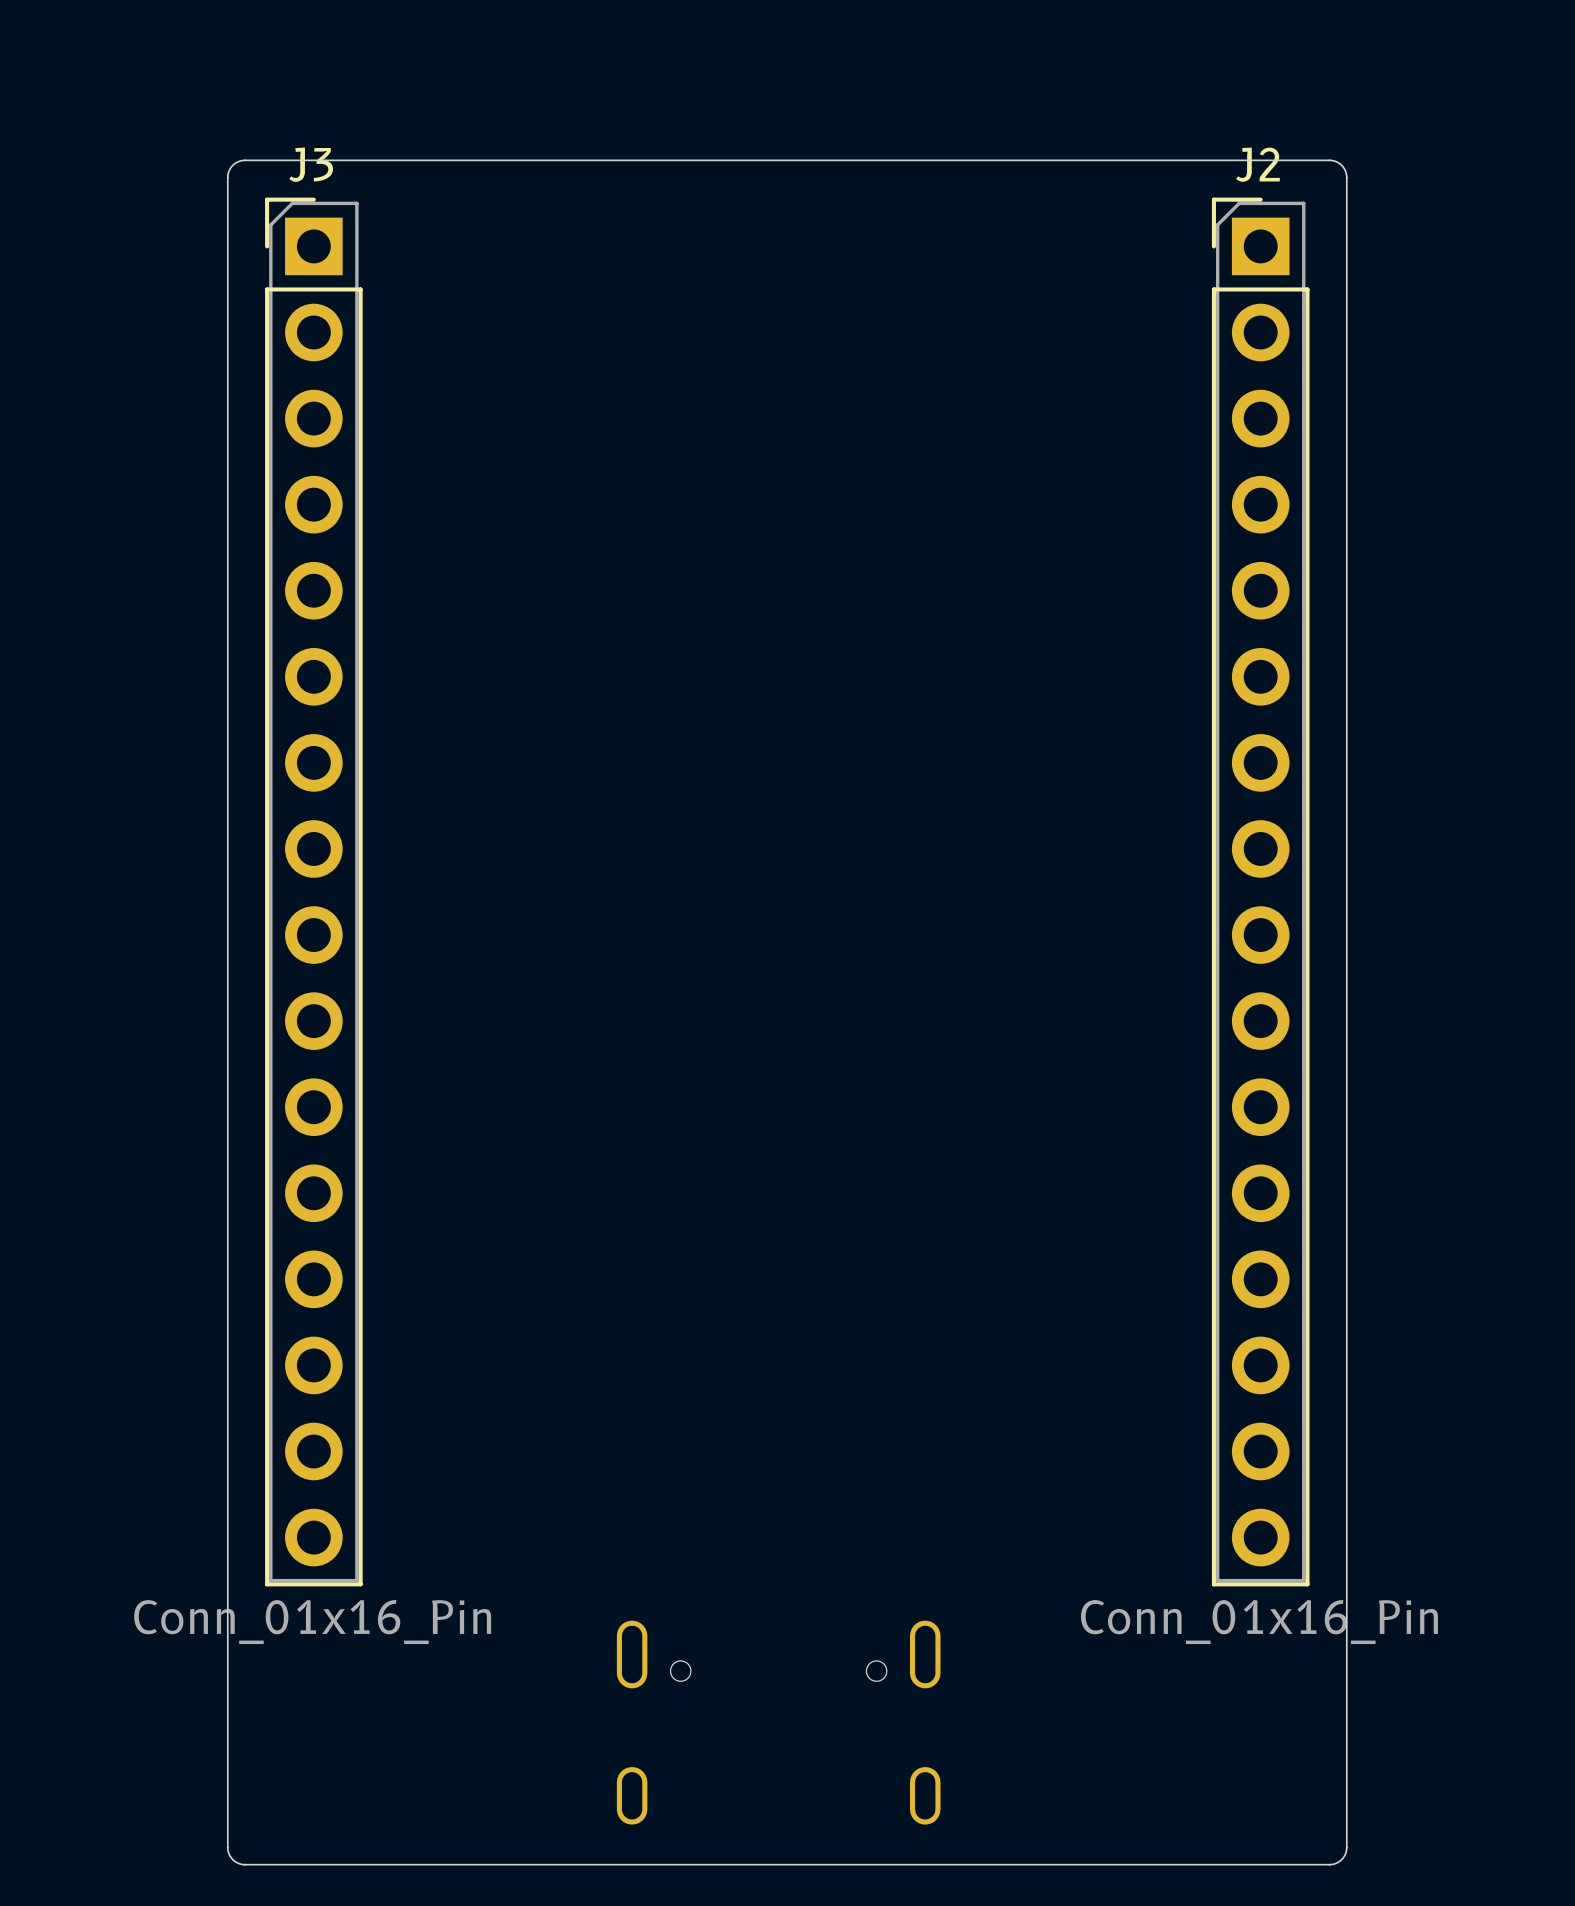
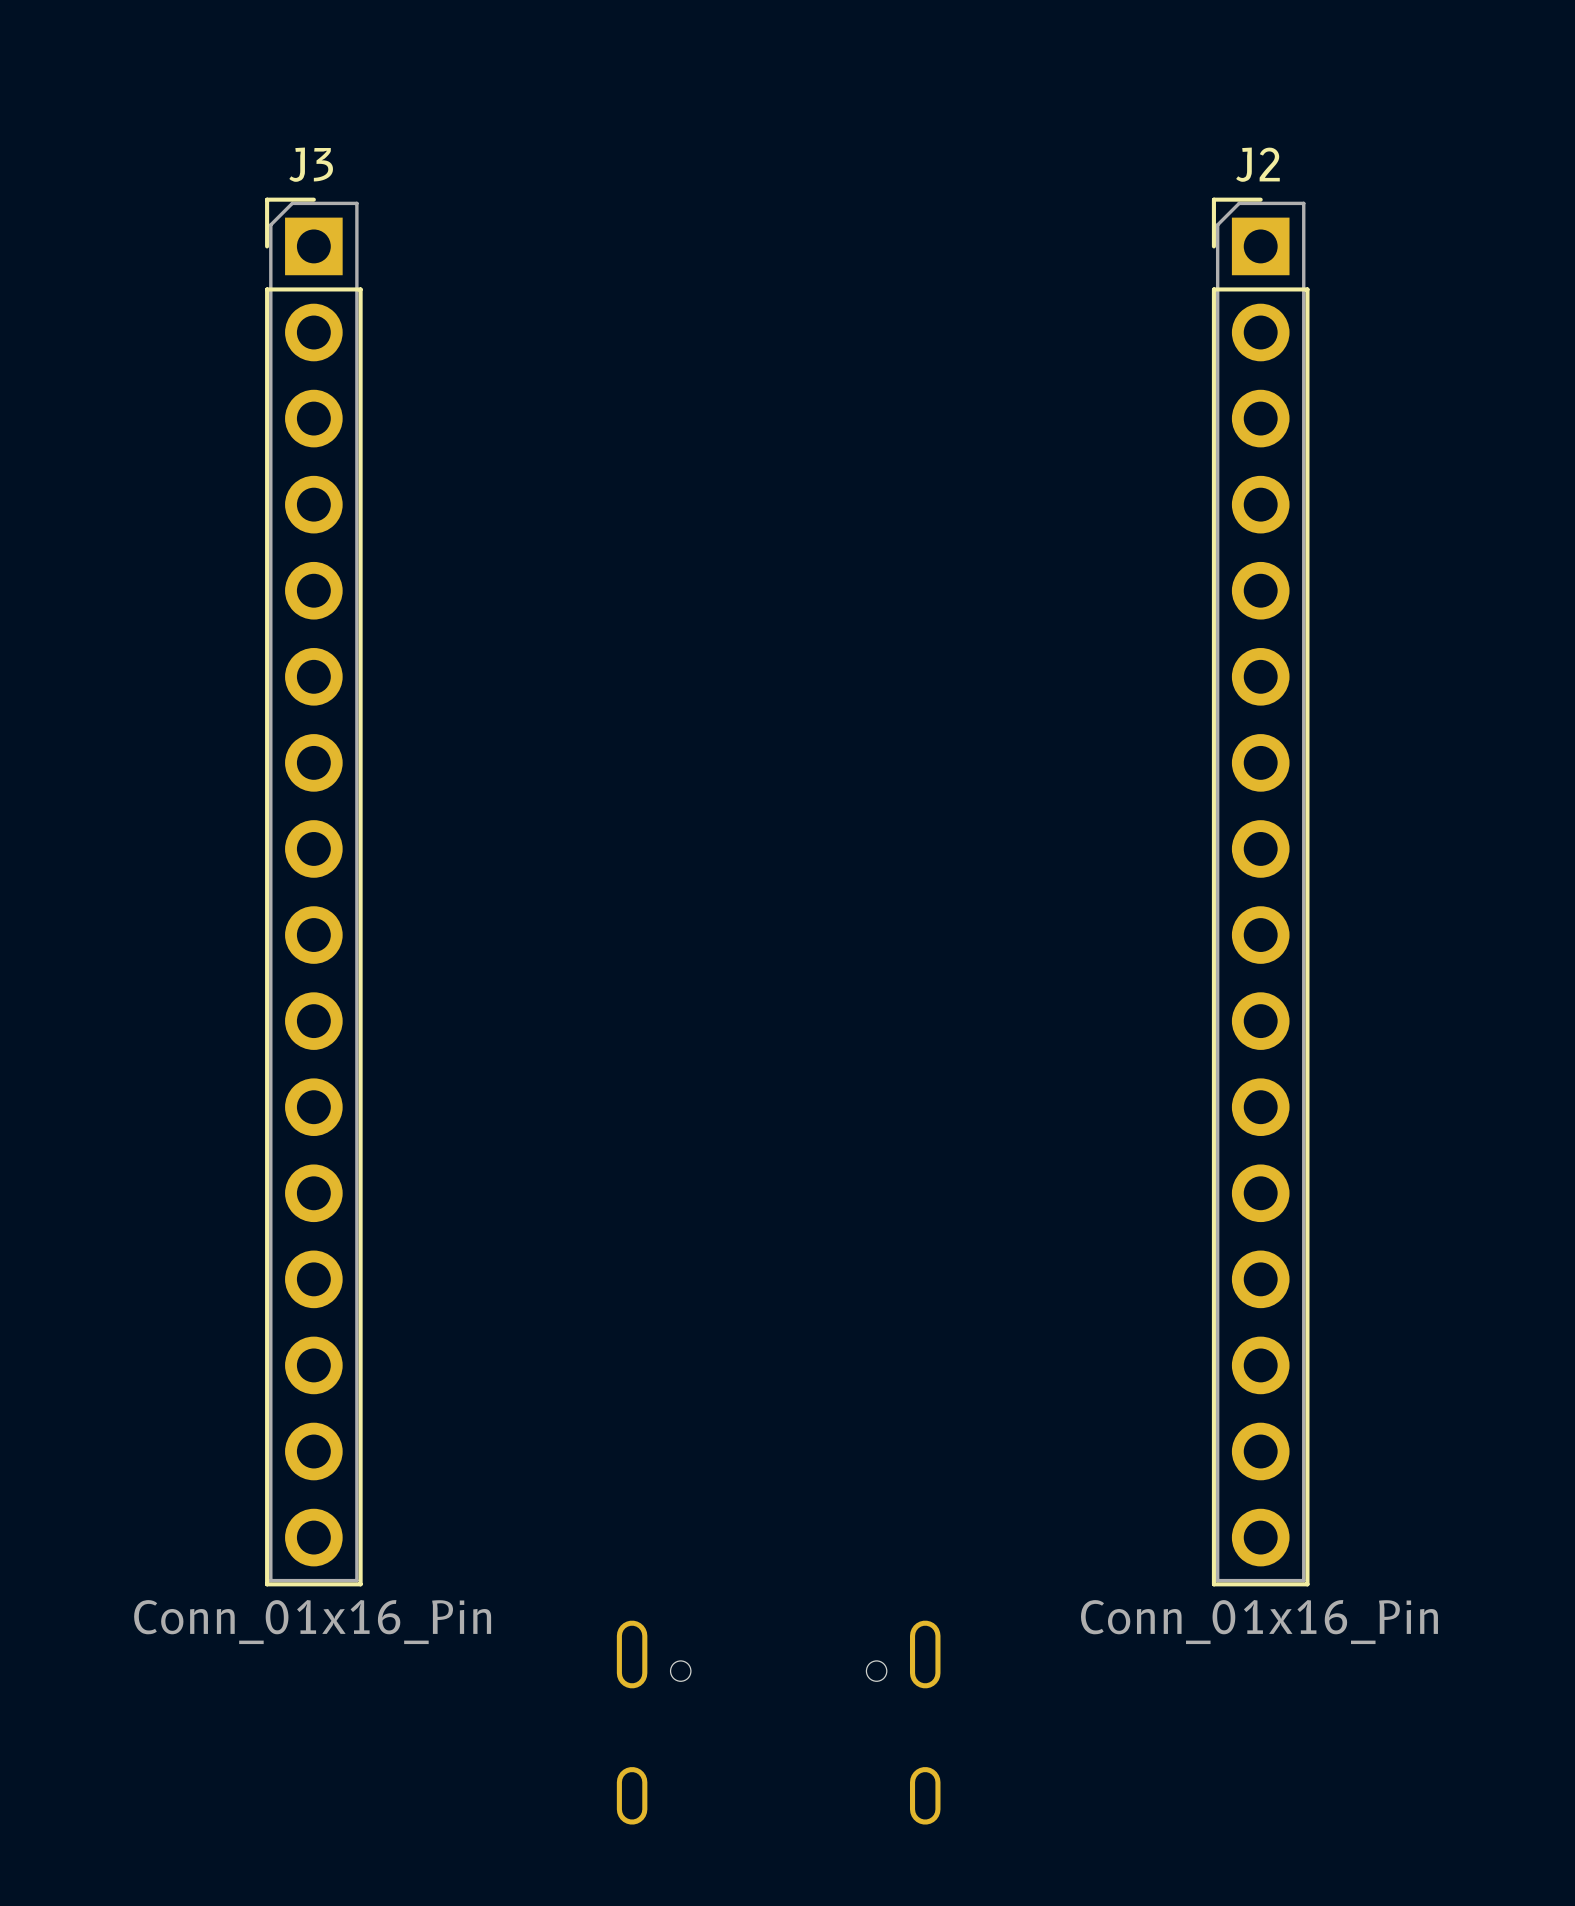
board edge: (1329, 160) (244, 160) (236, 162) (230, 168) (227, 177) (227, 1847) (230, 1856) (236, 1862) (244, 1864) (1329, 1864) (1338, 1862) (1344, 1856) (1346, 1847) (1346, 177) (1341, 165) (1329, 160) -> none

